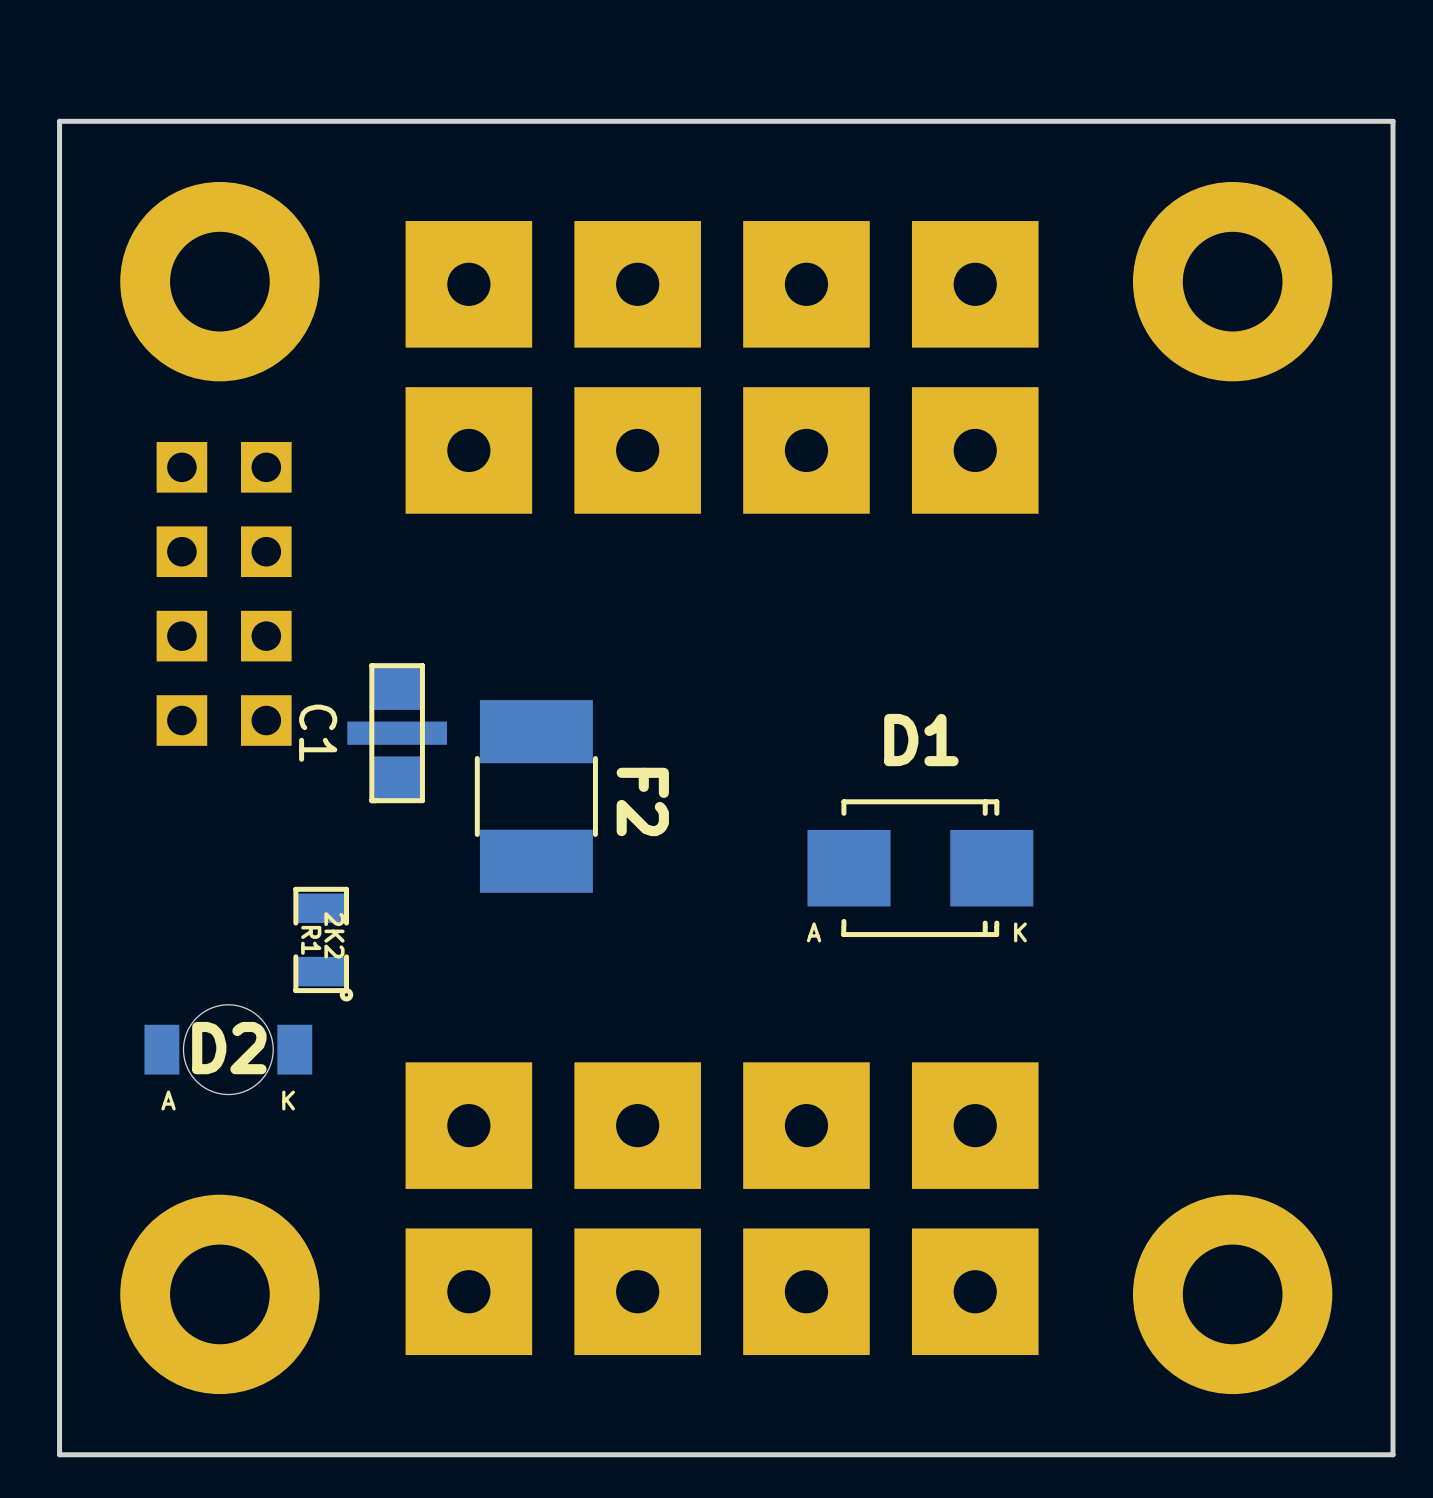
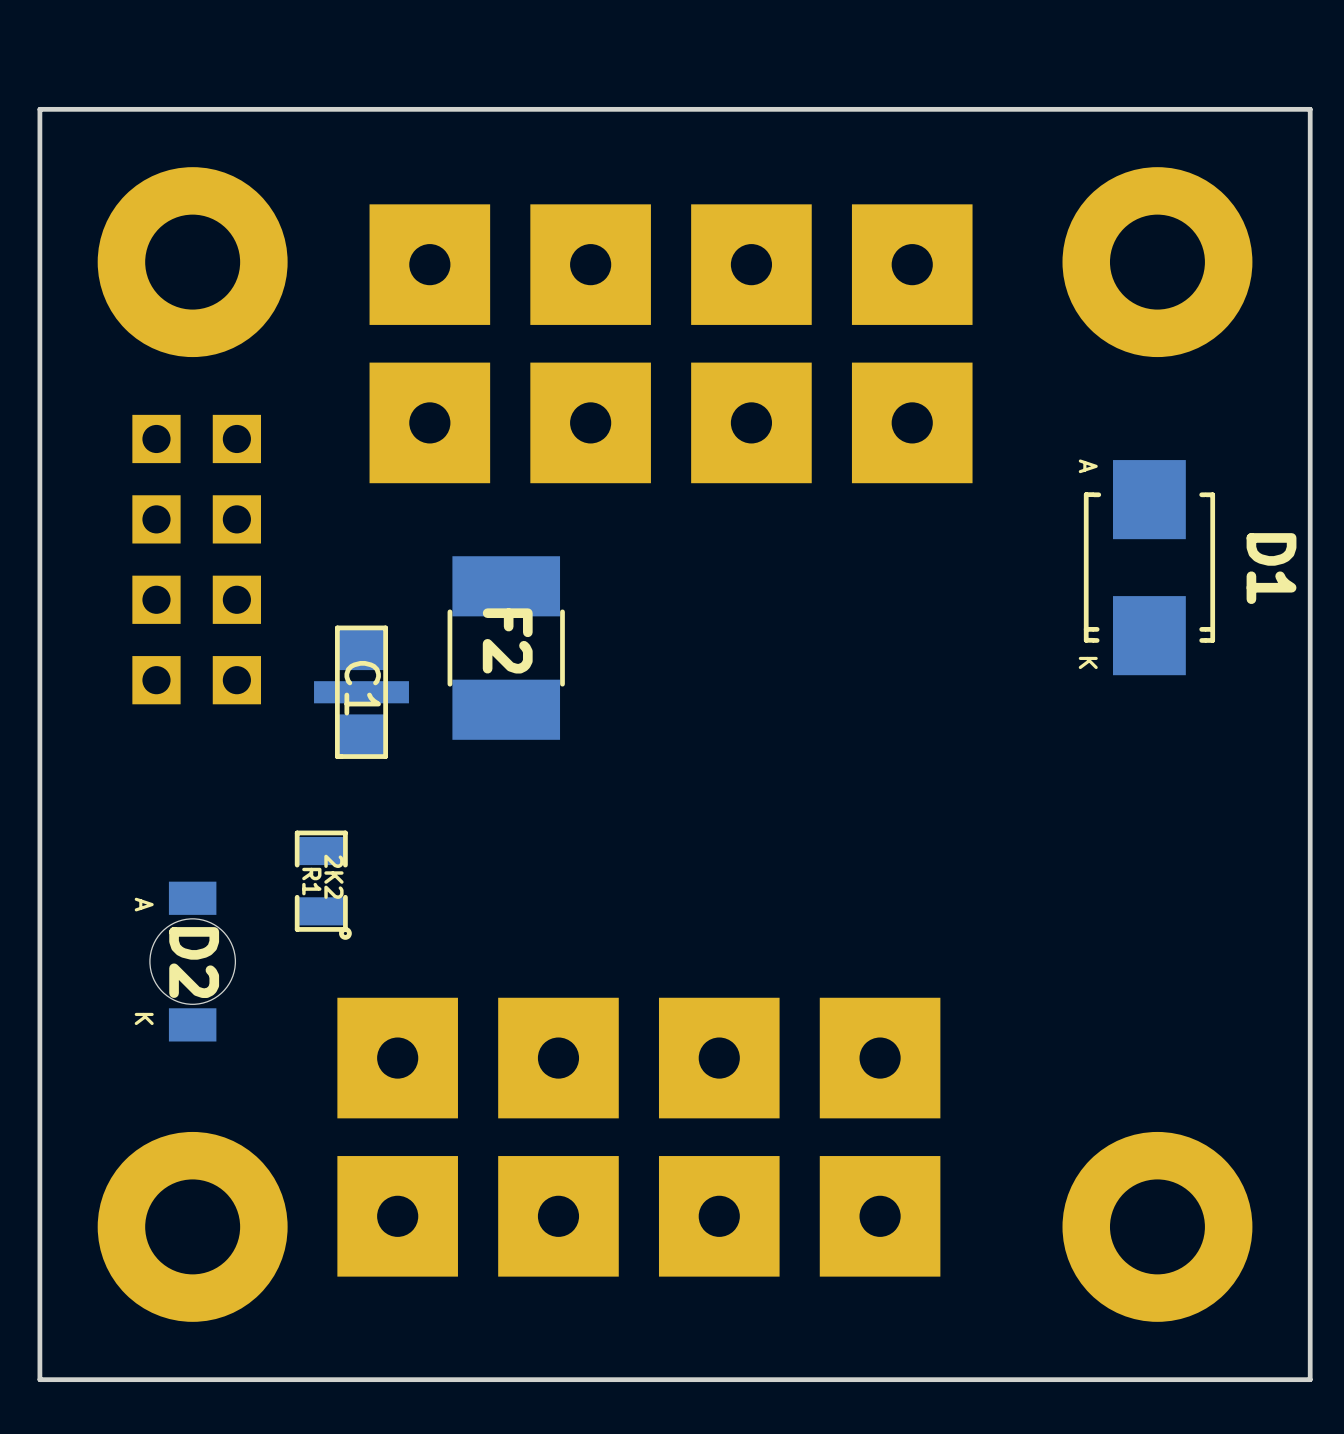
C1 name position: C1 (318, 733) -> C1 (362, 688)
F2 position: (536, 796) -> (506, 648)
F2 name position: F2 (642, 801) -> F2 (507, 640)
D1 rotation: 0° (920, 868) -> 90° clockwise (1149, 567)
D1 position: (920, 868) -> (1149, 567)
R1 position: (323, 944) -> (323, 885)
D2 rotation: 0° (228, 1049) -> 90° clockwise (192, 961)
part position: (468, 1208) -> (397, 1137)
part position: (637, 1208) -> (558, 1137)
part position: (806, 1208) -> (719, 1137)
part position: (975, 1208) -> (880, 1137)

